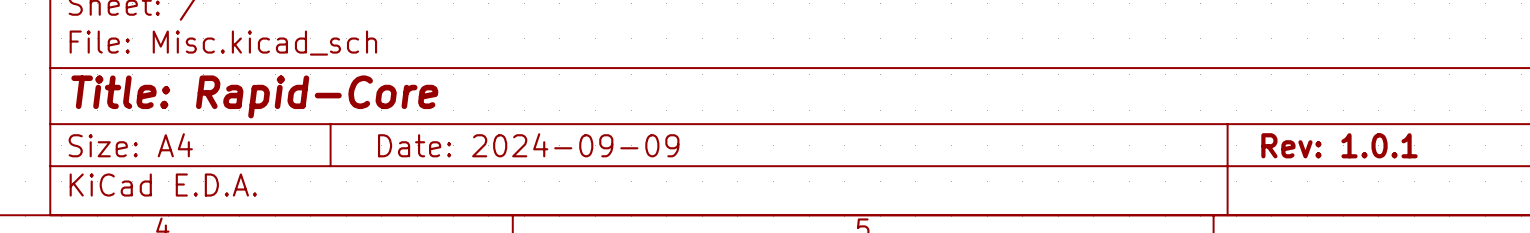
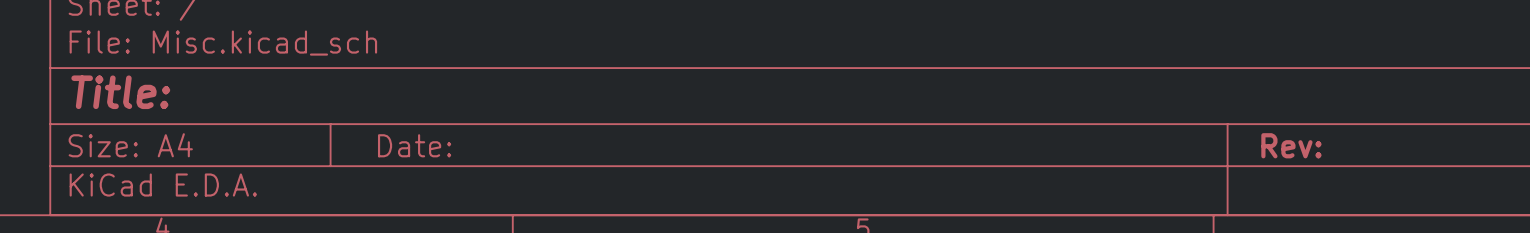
title block: Title: Rapid-Core (254, 96) -> Title: (120, 92)
title block: Date: 2024-09-09 (528, 145) -> Date: (414, 145)
title block: Rev: 1.0.1 (1339, 145) -> Rev: (1291, 145)

